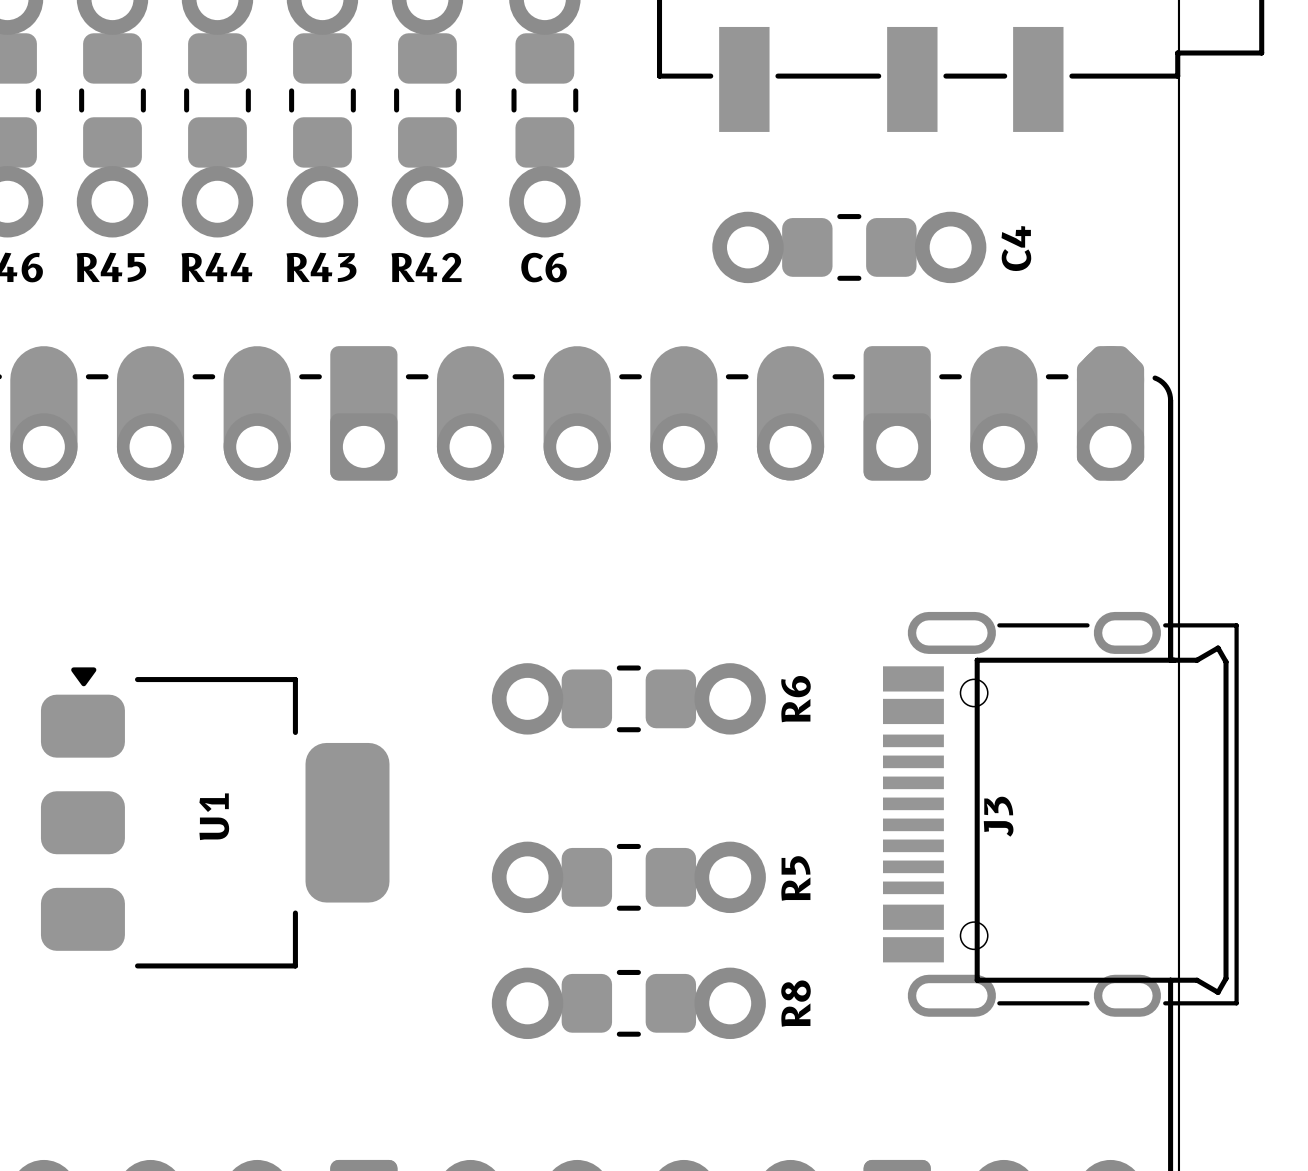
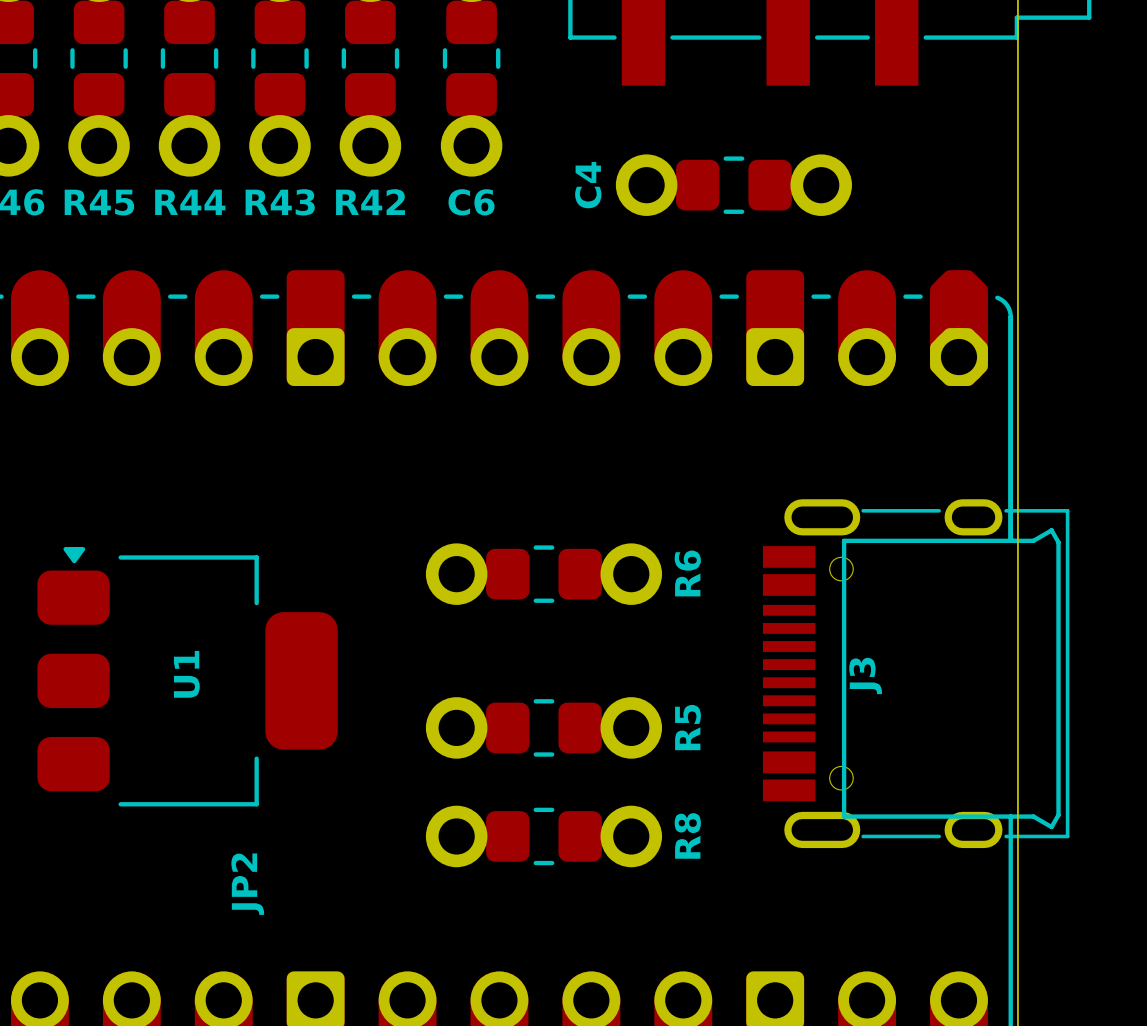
C4 name position: C4 (1016, 248) -> C4 (588, 185)
JP2: none -> (247, 884)

